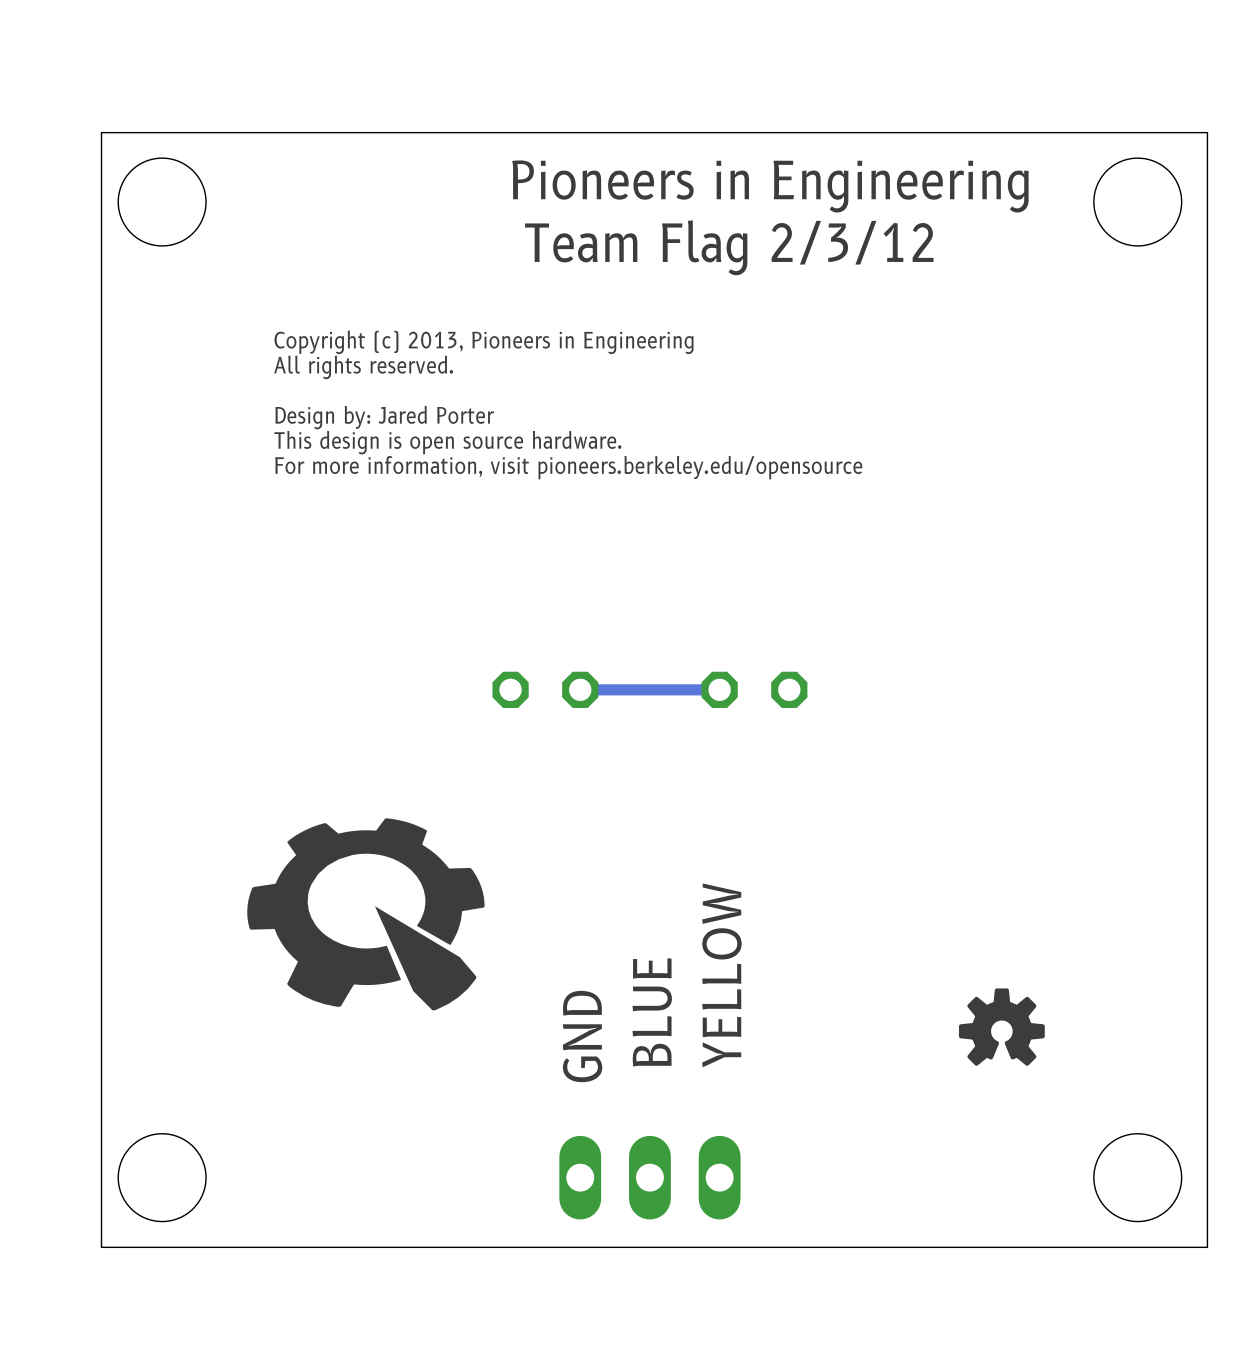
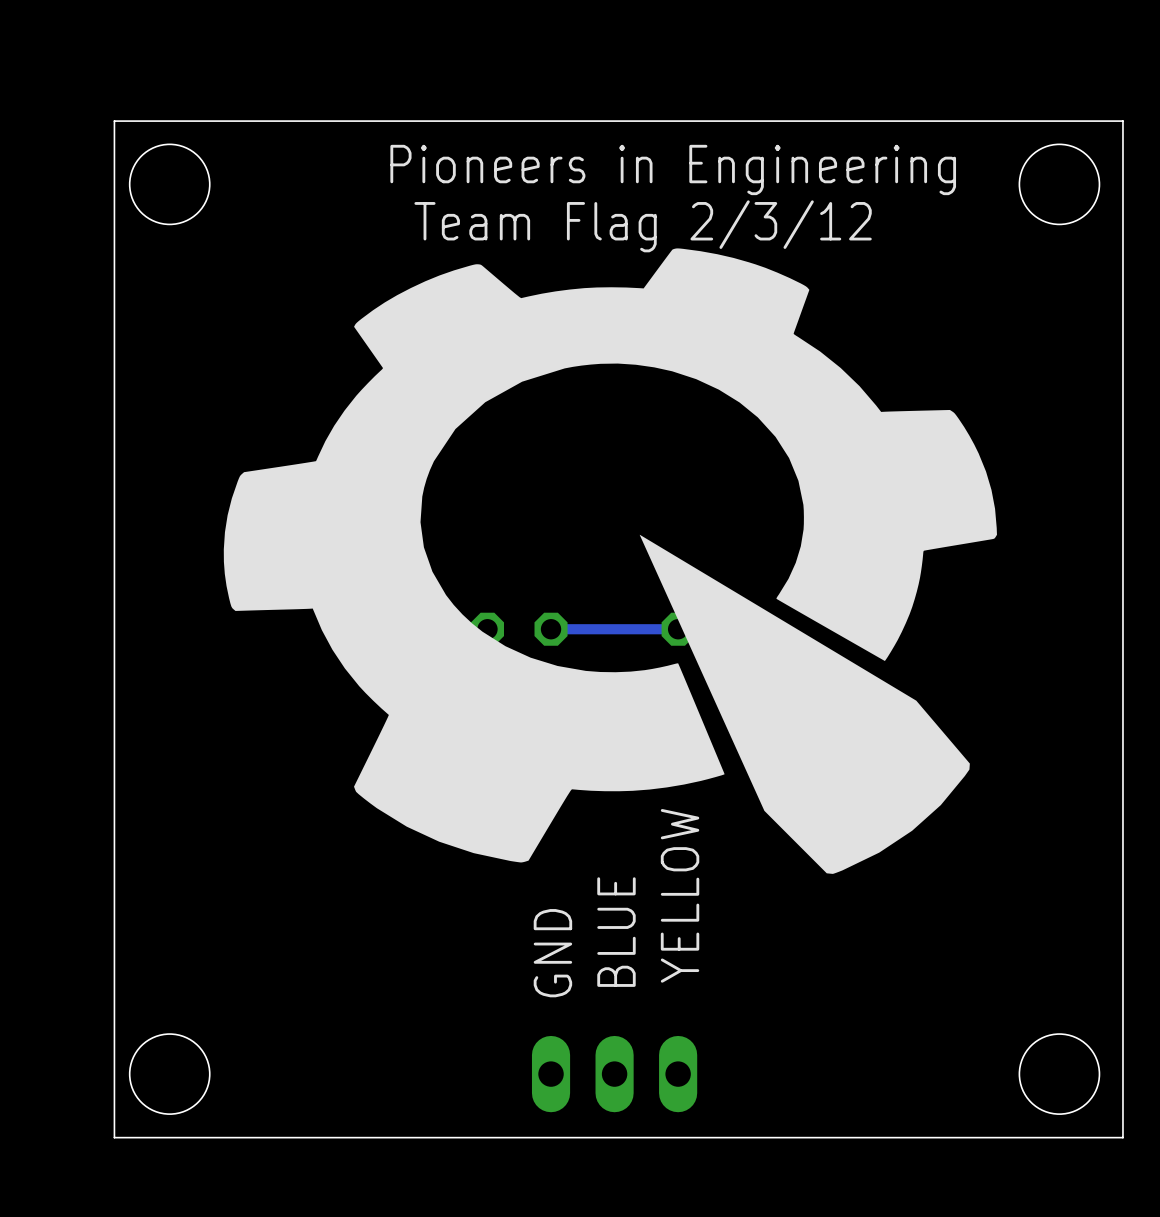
drawing: none -> [223, 248, 997, 874]
text: Copyright (c) 2013, Pioneers in Engineering (484, 342) -> none
text: All rights reserved. (363, 367) -> none
text: Design by: Jared Porter (384, 417) -> none
text: This design is open source hardware. (447, 442) -> none
text: For more information, visit pioneers.berkeley.edu/opensource (568, 467) -> none
drawing: [247, 818, 485, 1011] -> none
drawing: [958, 988, 1045, 1066] -> none

